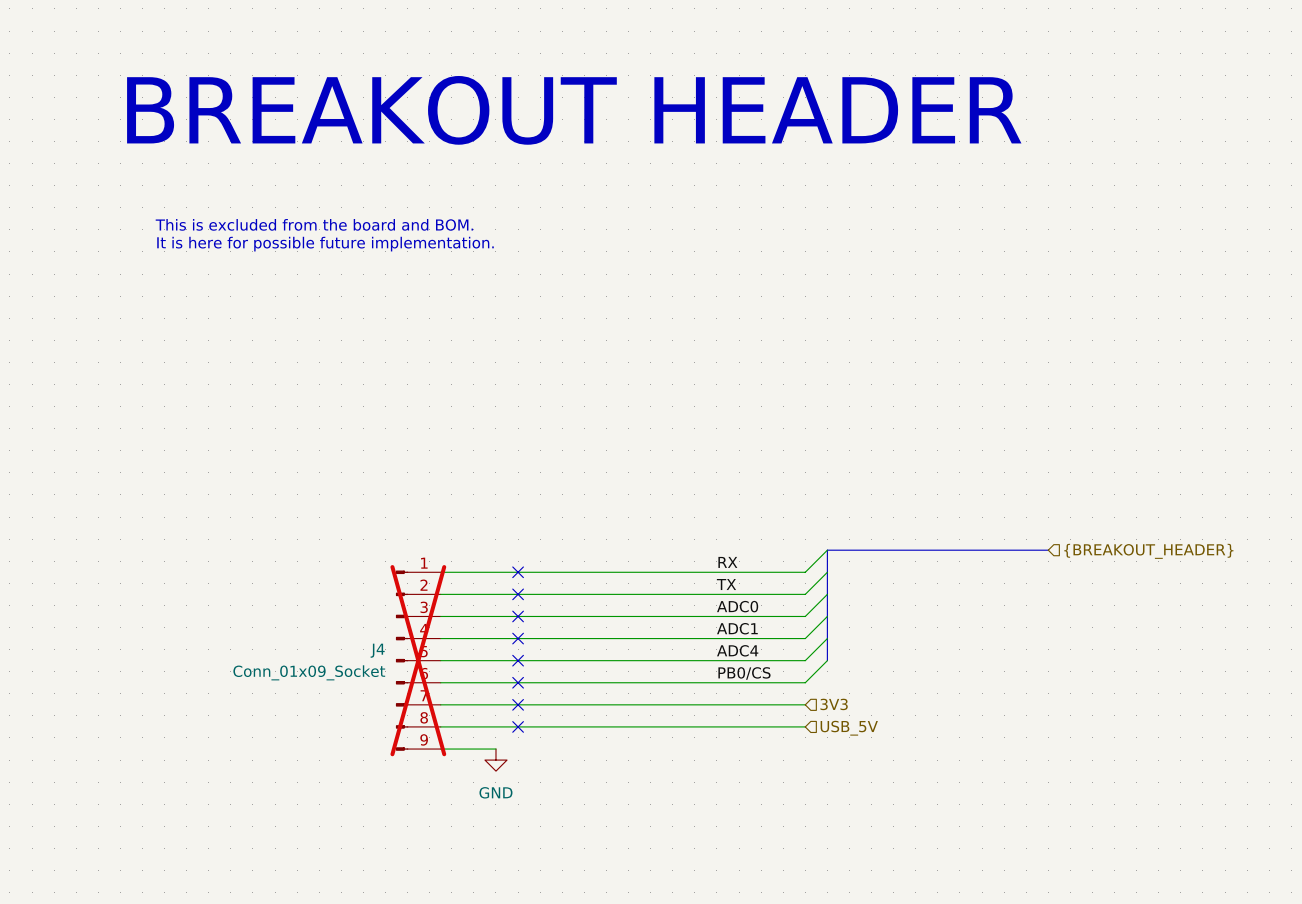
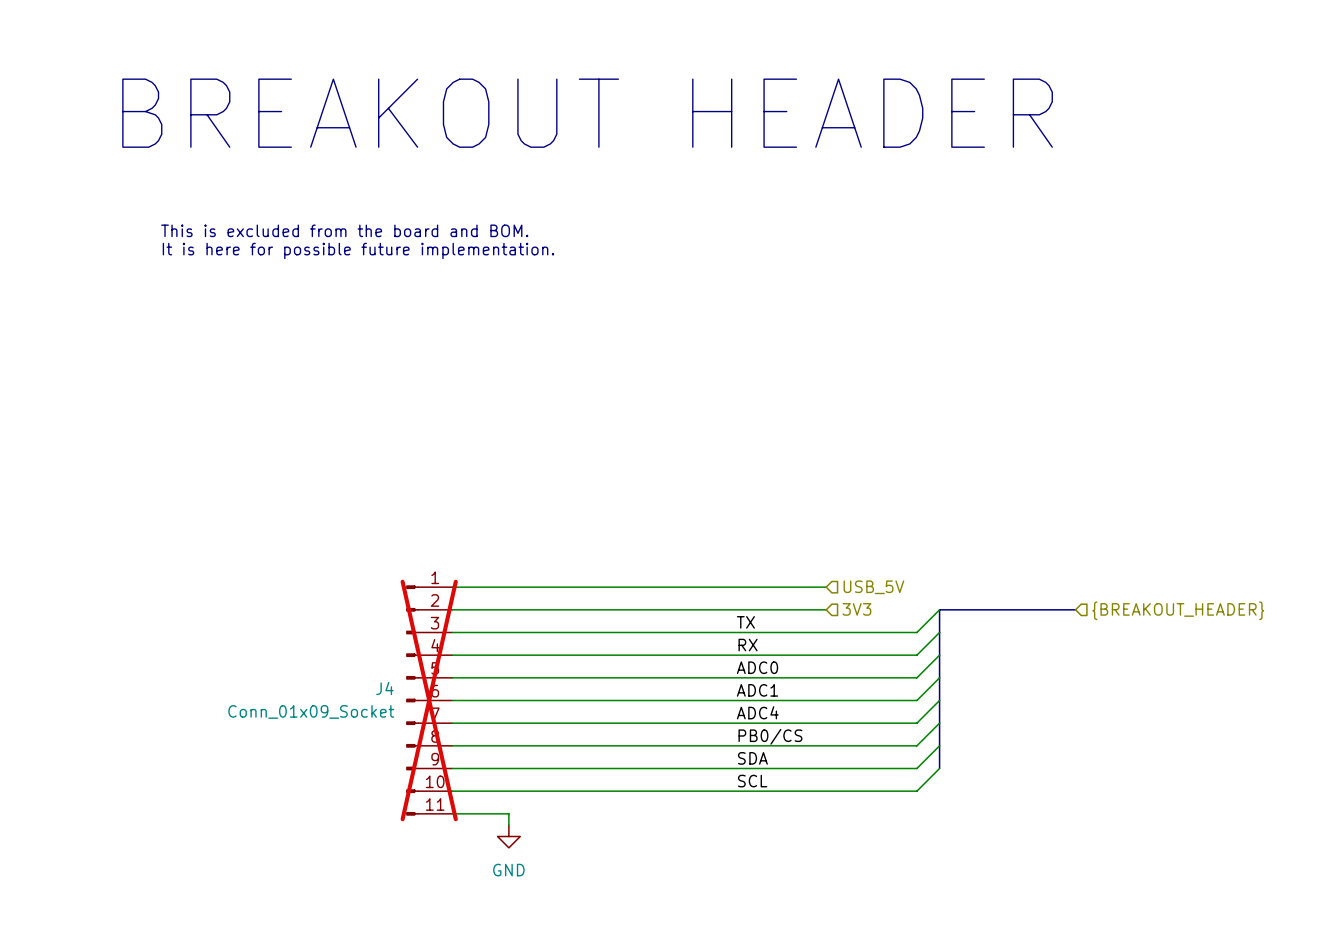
wire: (827, 550) (805, 572) -> none
bus: (1048, 550) (827, 550) (827, 660) -> none
hierarchical label position: {BREAKOUT_HEADER} (1148, 551) -> {BREAKOUT_HEADER} (1178, 610)
label: RX (727, 562) -> none
J4 symbol: [395, 570, 441, 751] -> [406, 585, 453, 816]
no-connect mark: (518, 572) -> none
wire: (827, 572) (805, 594) -> none
label: TX (726, 584) -> none
no-connect mark: (518, 594) -> none
wire: (827, 594) (805, 616) -> (939, 609) (916, 632) (826, 632)
bus: none -> (1075, 609) (939, 609) (939, 768)
label: ADC0 (737, 606) -> TX (745, 622)
no-connect mark: (518, 616) -> none
wire: (827, 616) (805, 638) -> (939, 632) (916, 655) (826, 655)
label: ADC1 (737, 628) -> RX (748, 645)
no-connect mark: (518, 638) -> none
wire: (827, 638) (805, 660) -> (939, 655) (916, 677) (826, 677)
label: ADC4 (737, 650) -> ADC0 (757, 667)
no-connect mark: (518, 660) -> none
wire: (827, 660) (805, 682) -> (939, 677) (916, 700) (826, 700)
label: PB0/CS (744, 673) -> ADC1 (757, 690)
no-connect mark: (518, 682) -> none
wire: none -> (939, 700) (916, 723) (826, 723)
label: none -> ADC4 (757, 712)
no-connect mark: (518, 704) -> none
hierarchical label position: 3V3 (834, 704) -> 3V3 (856, 609)
wire: none -> (939, 723) (916, 745) (826, 745)
label: none -> PB0/CS (770, 736)
no-connect mark: (518, 726) -> none
wire: none -> (939, 745) (916, 768) (508, 768)
hierarchical label position: USB_5V (849, 728) -> USB_5V (873, 587)
label: none -> SDA (752, 758)
wire: none -> (939, 768) (916, 791) (452, 791)
power symbol position: GND (495, 760) -> GND (508, 836)
label: none -> SCL (752, 781)
wire: none -> (452, 813) (508, 813) (508, 825)

